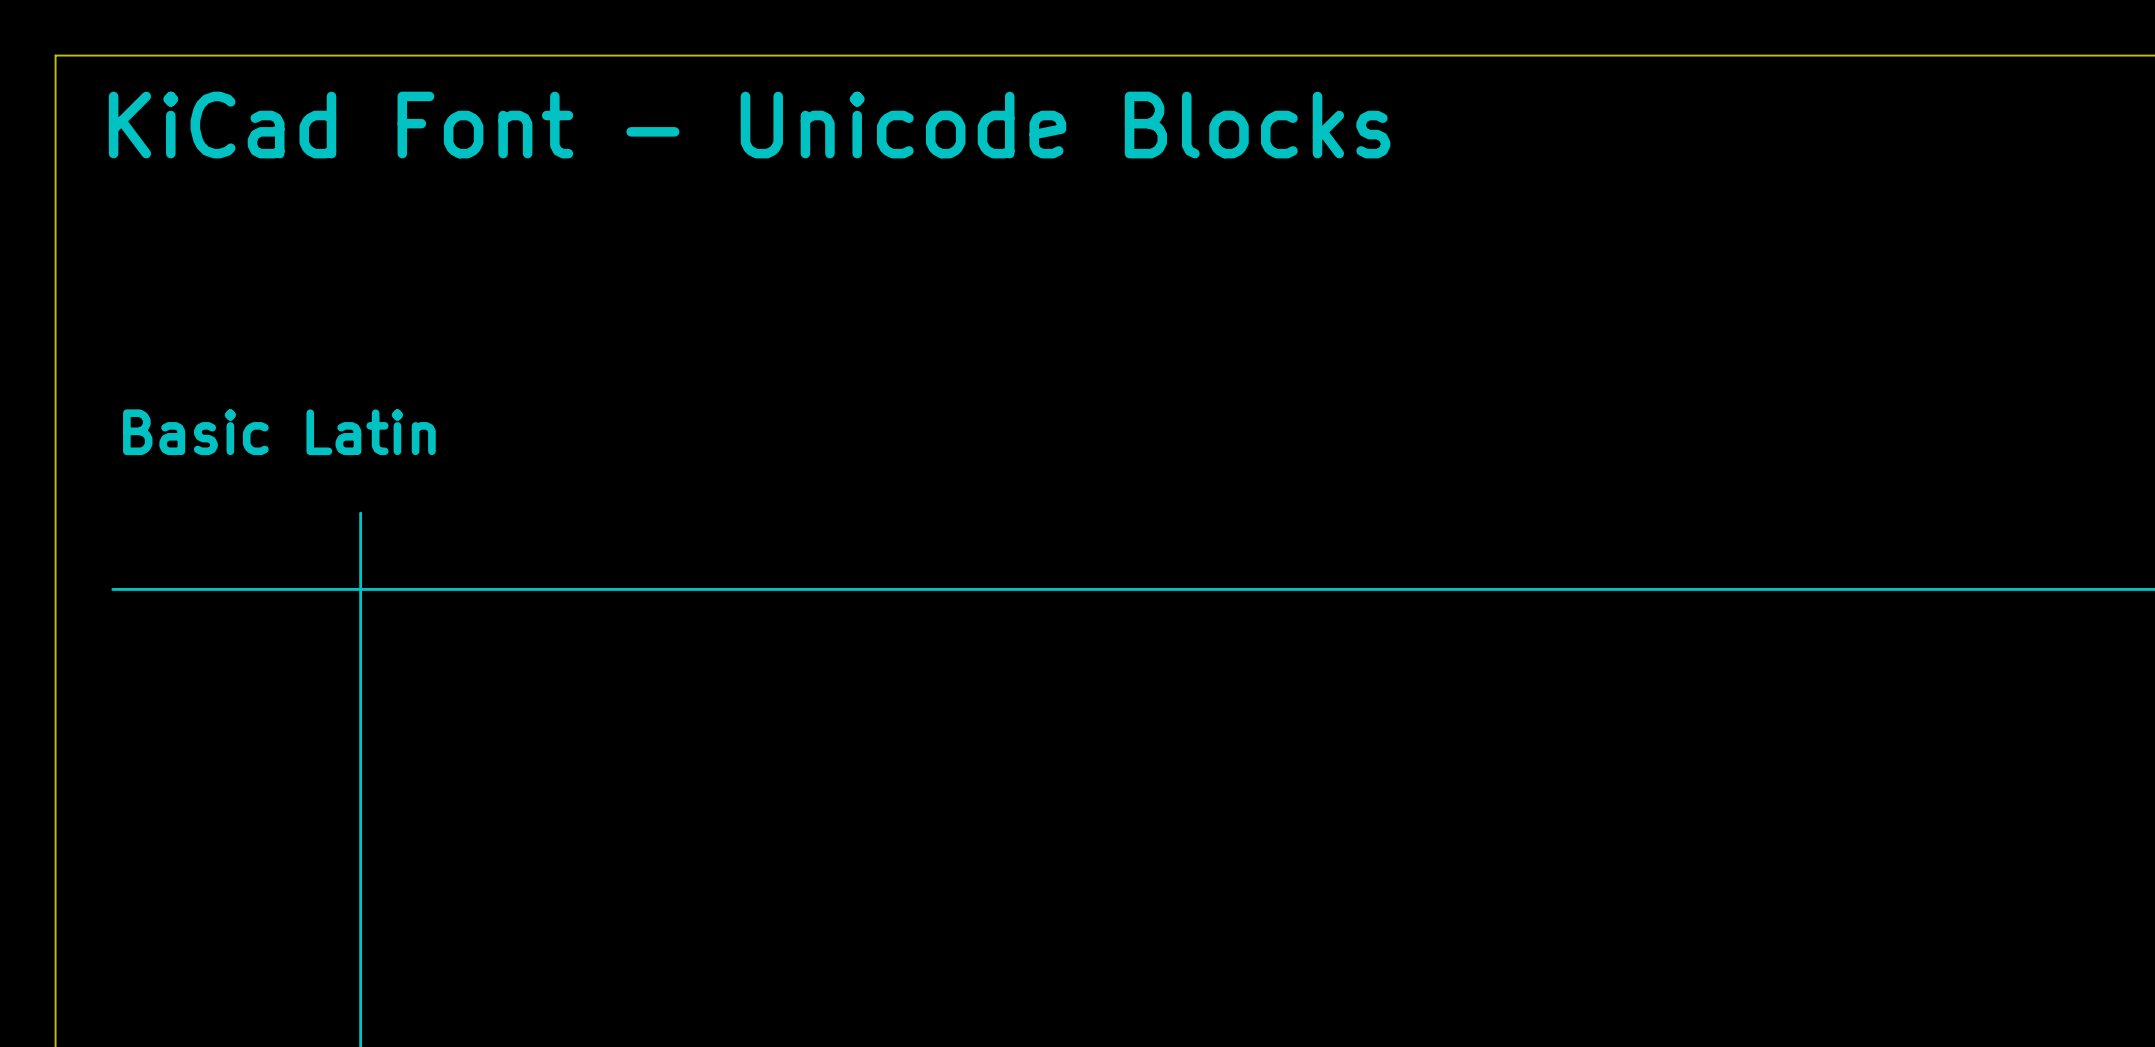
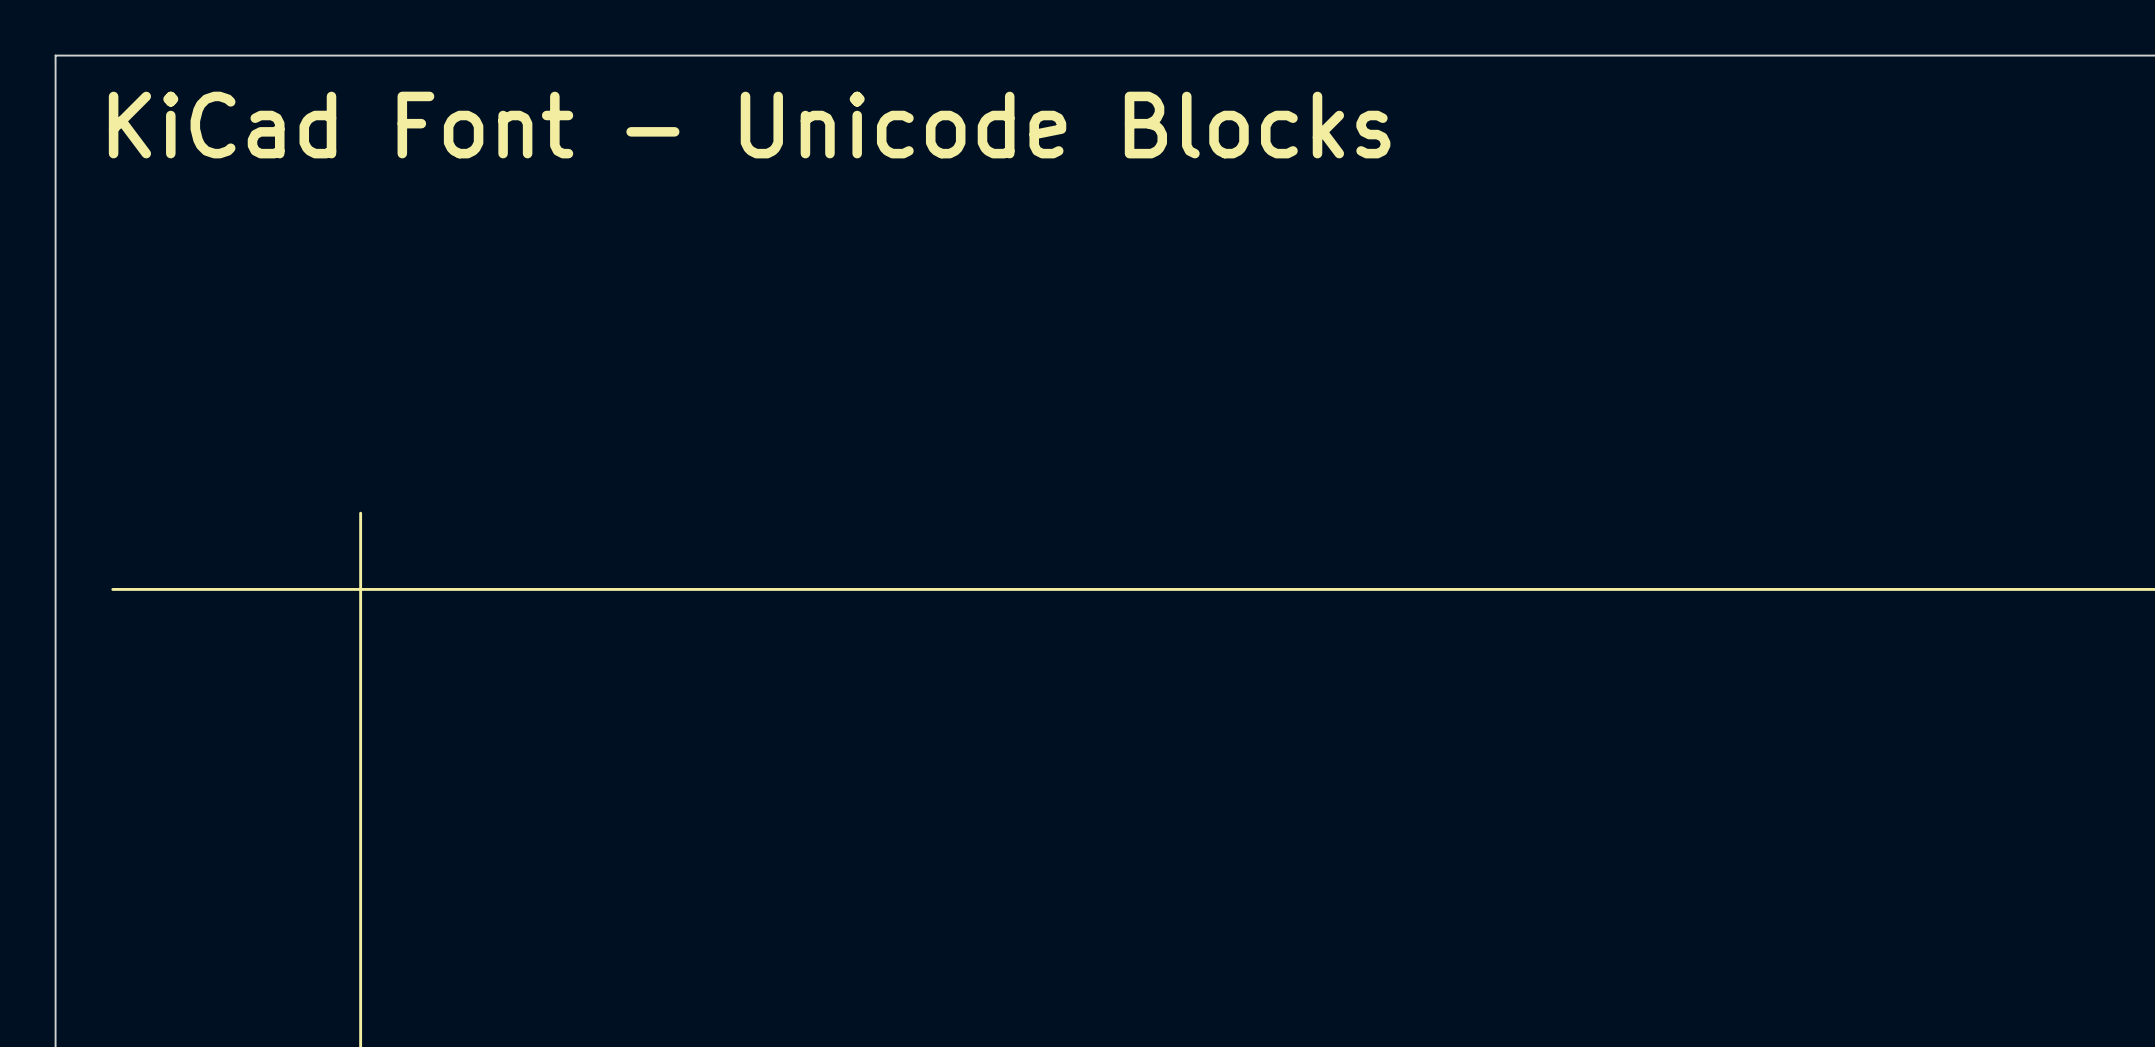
text: Basic Latin (279, 432) -> none

